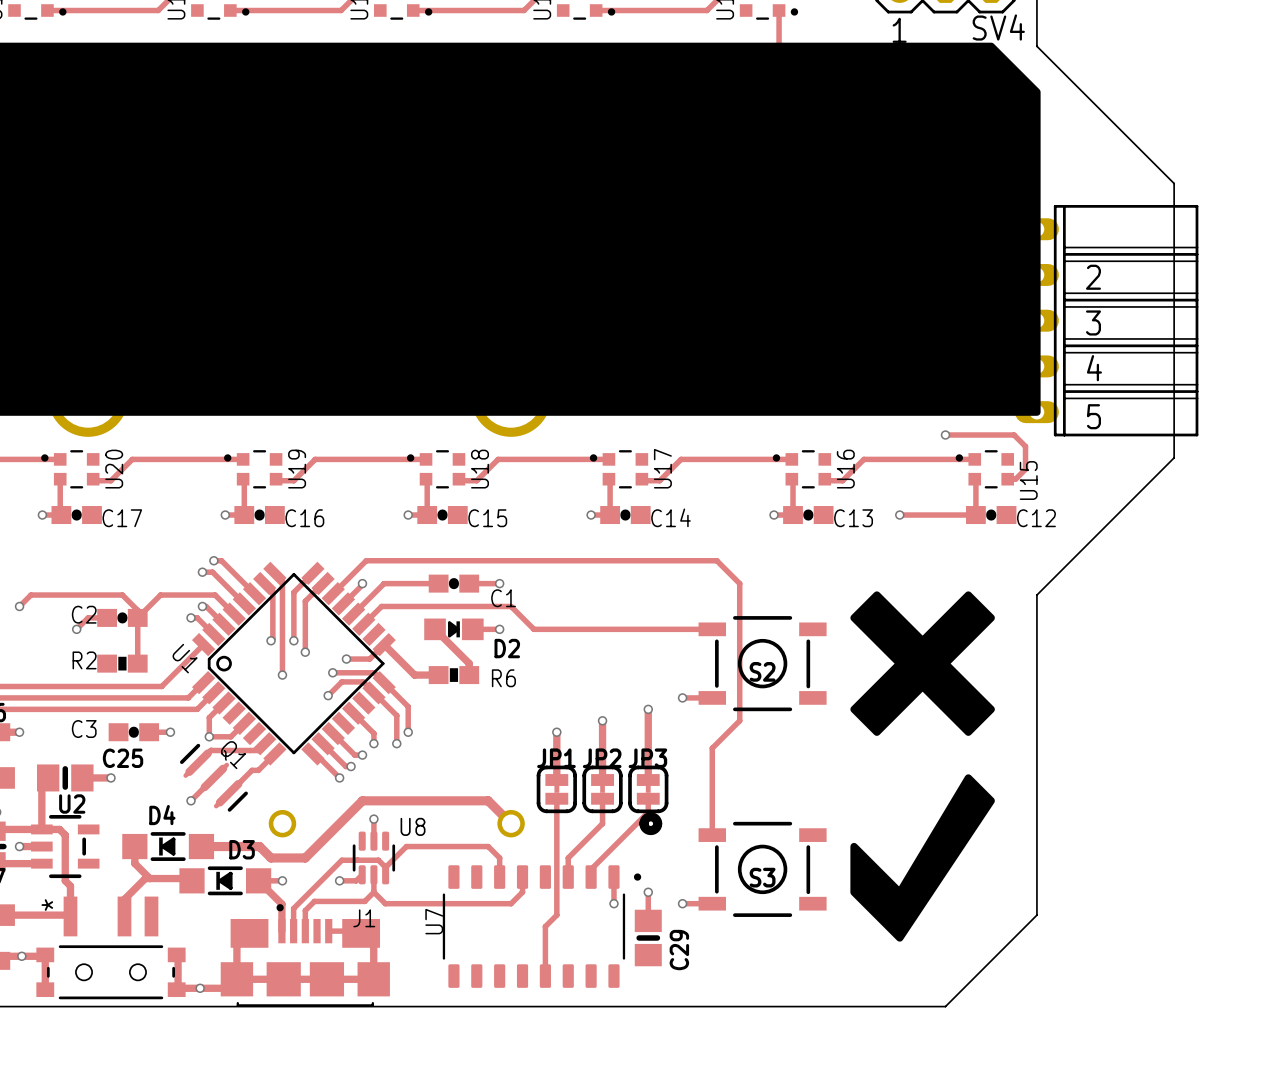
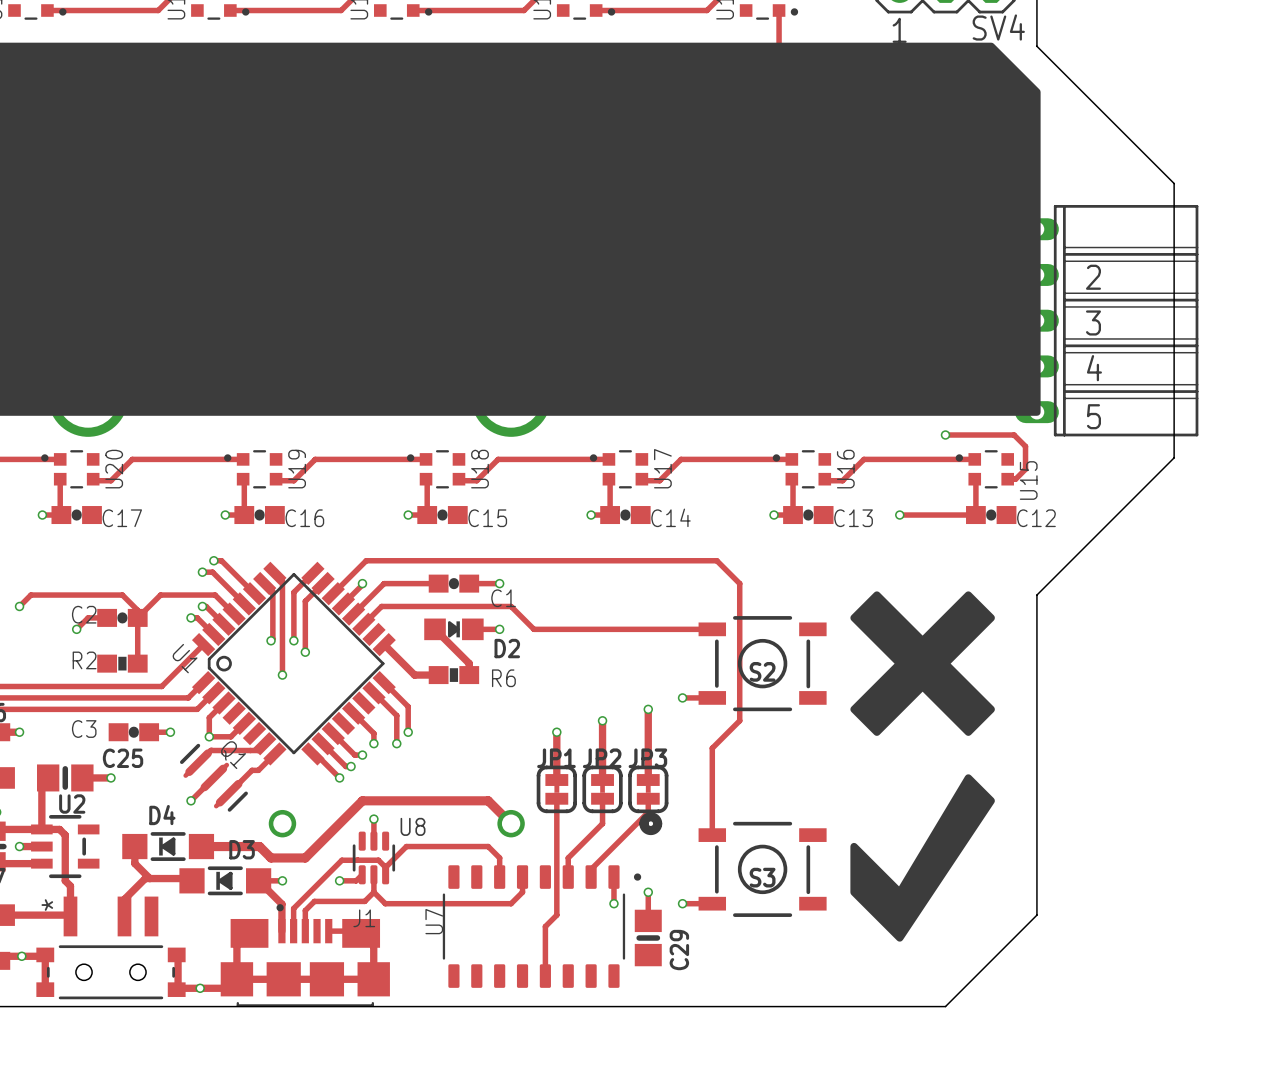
track: (384, 644) (369, 659) (346, 659) -> none
via: (346, 659) -> none
track: (332, 672) (374, 672) (384, 682) -> none
via: (332, 672) -> none
track: (374, 692) (363, 681) (341, 681) (328, 695) -> none
via: (328, 695) -> none

